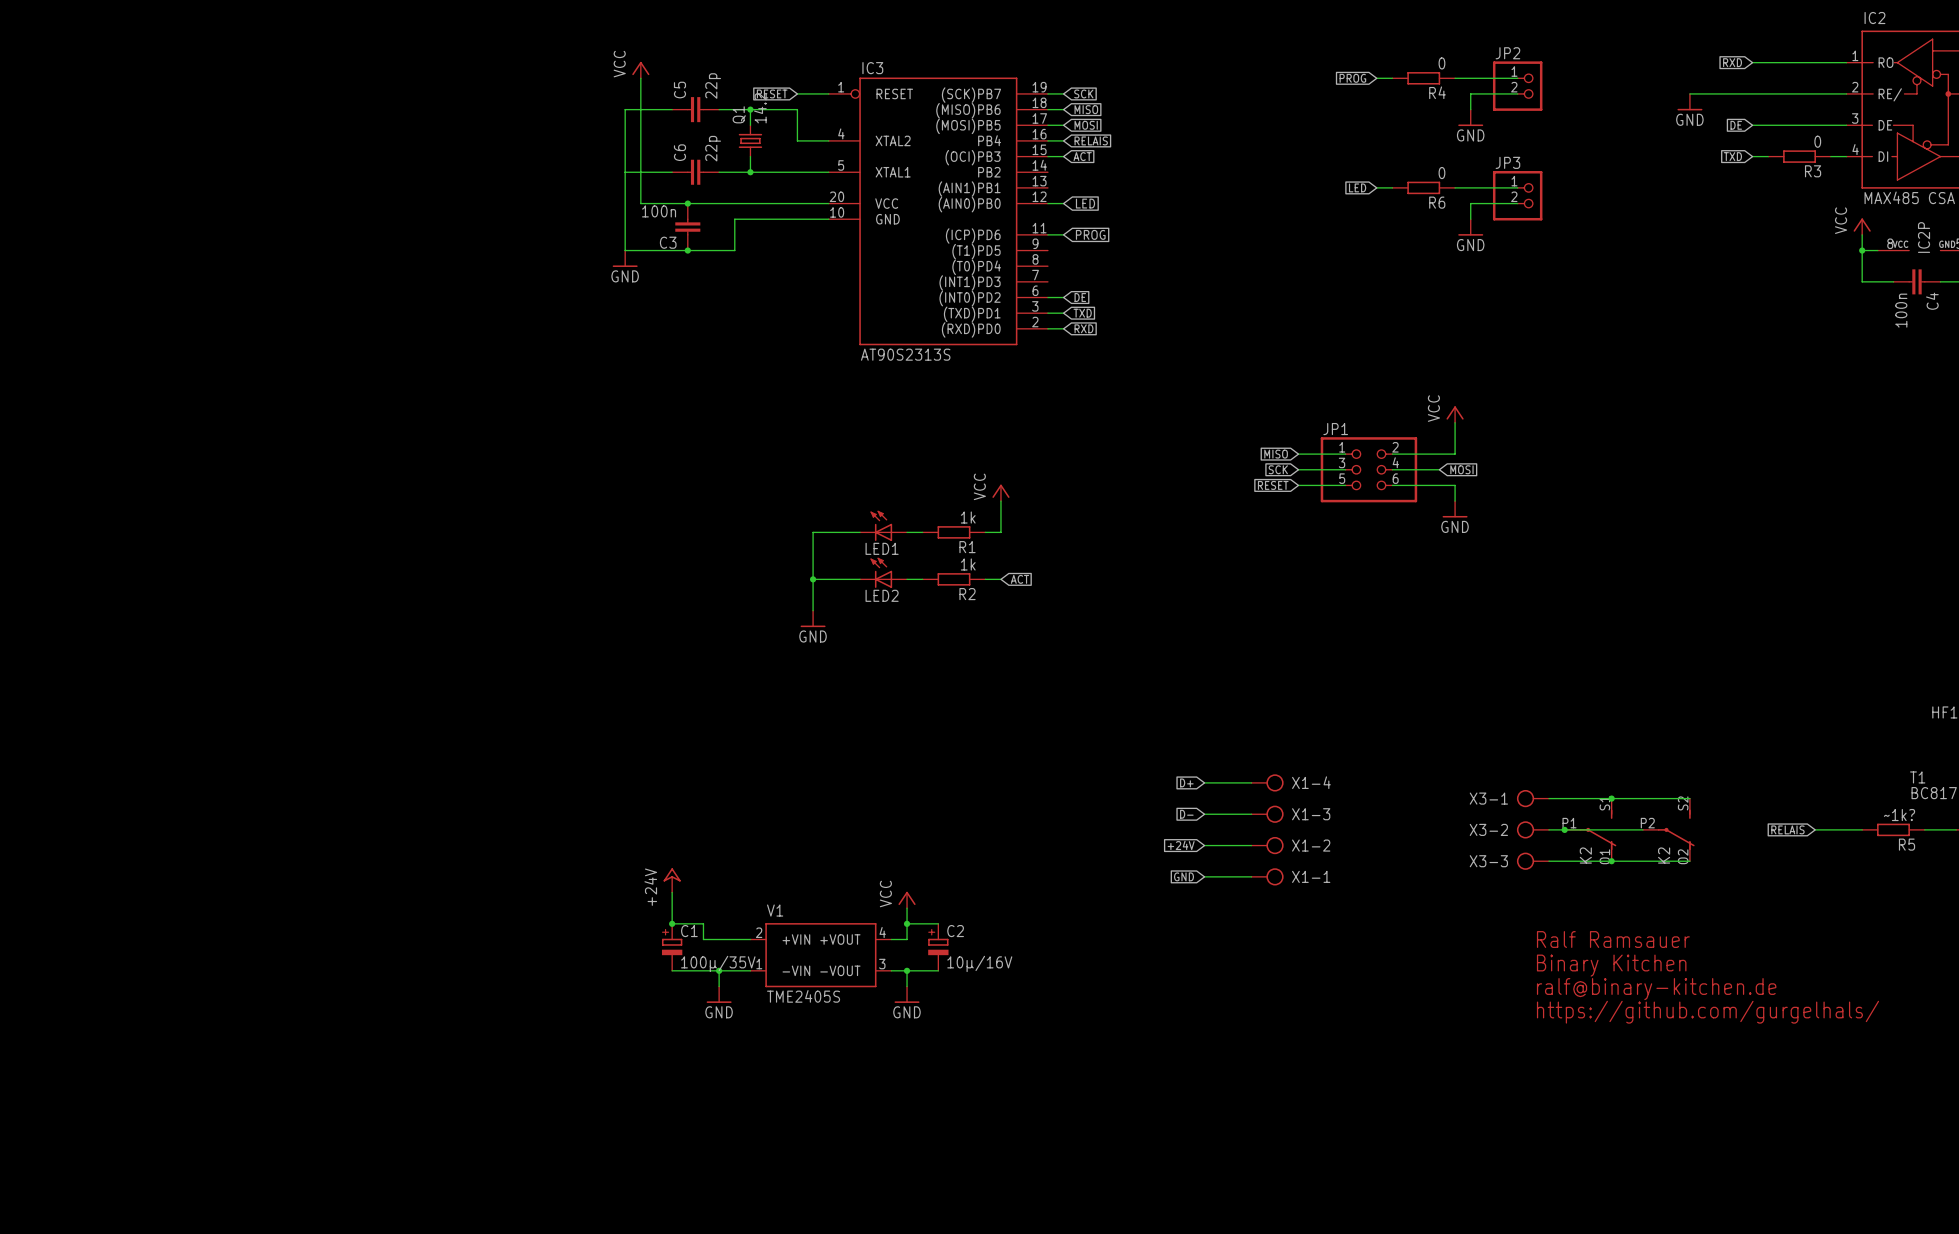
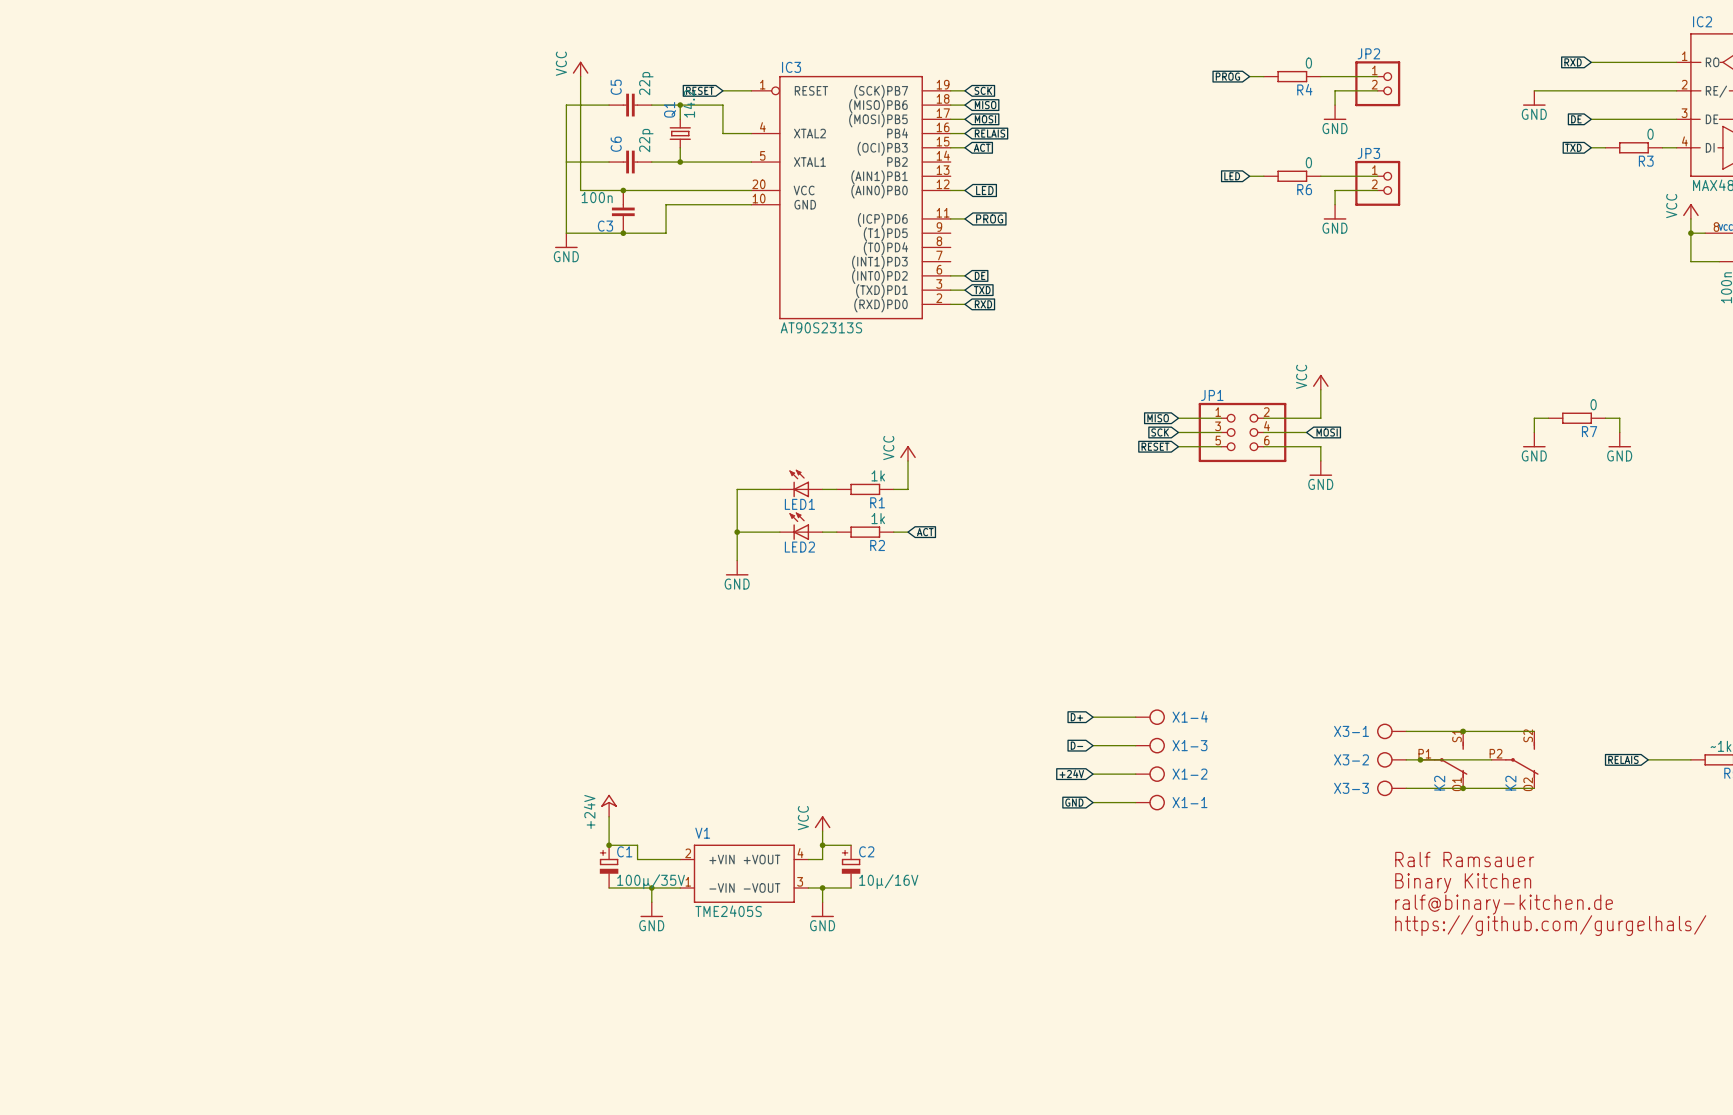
wire: none -> (1548, 418) (1534, 418) (1534, 432)
R7: none -> 0 (1577, 418)
wire: none -> (1605, 418) (1619, 418) (1619, 432)
power symbol: none -> GND (1534, 439)
power symbol: none -> GND (1619, 439)

